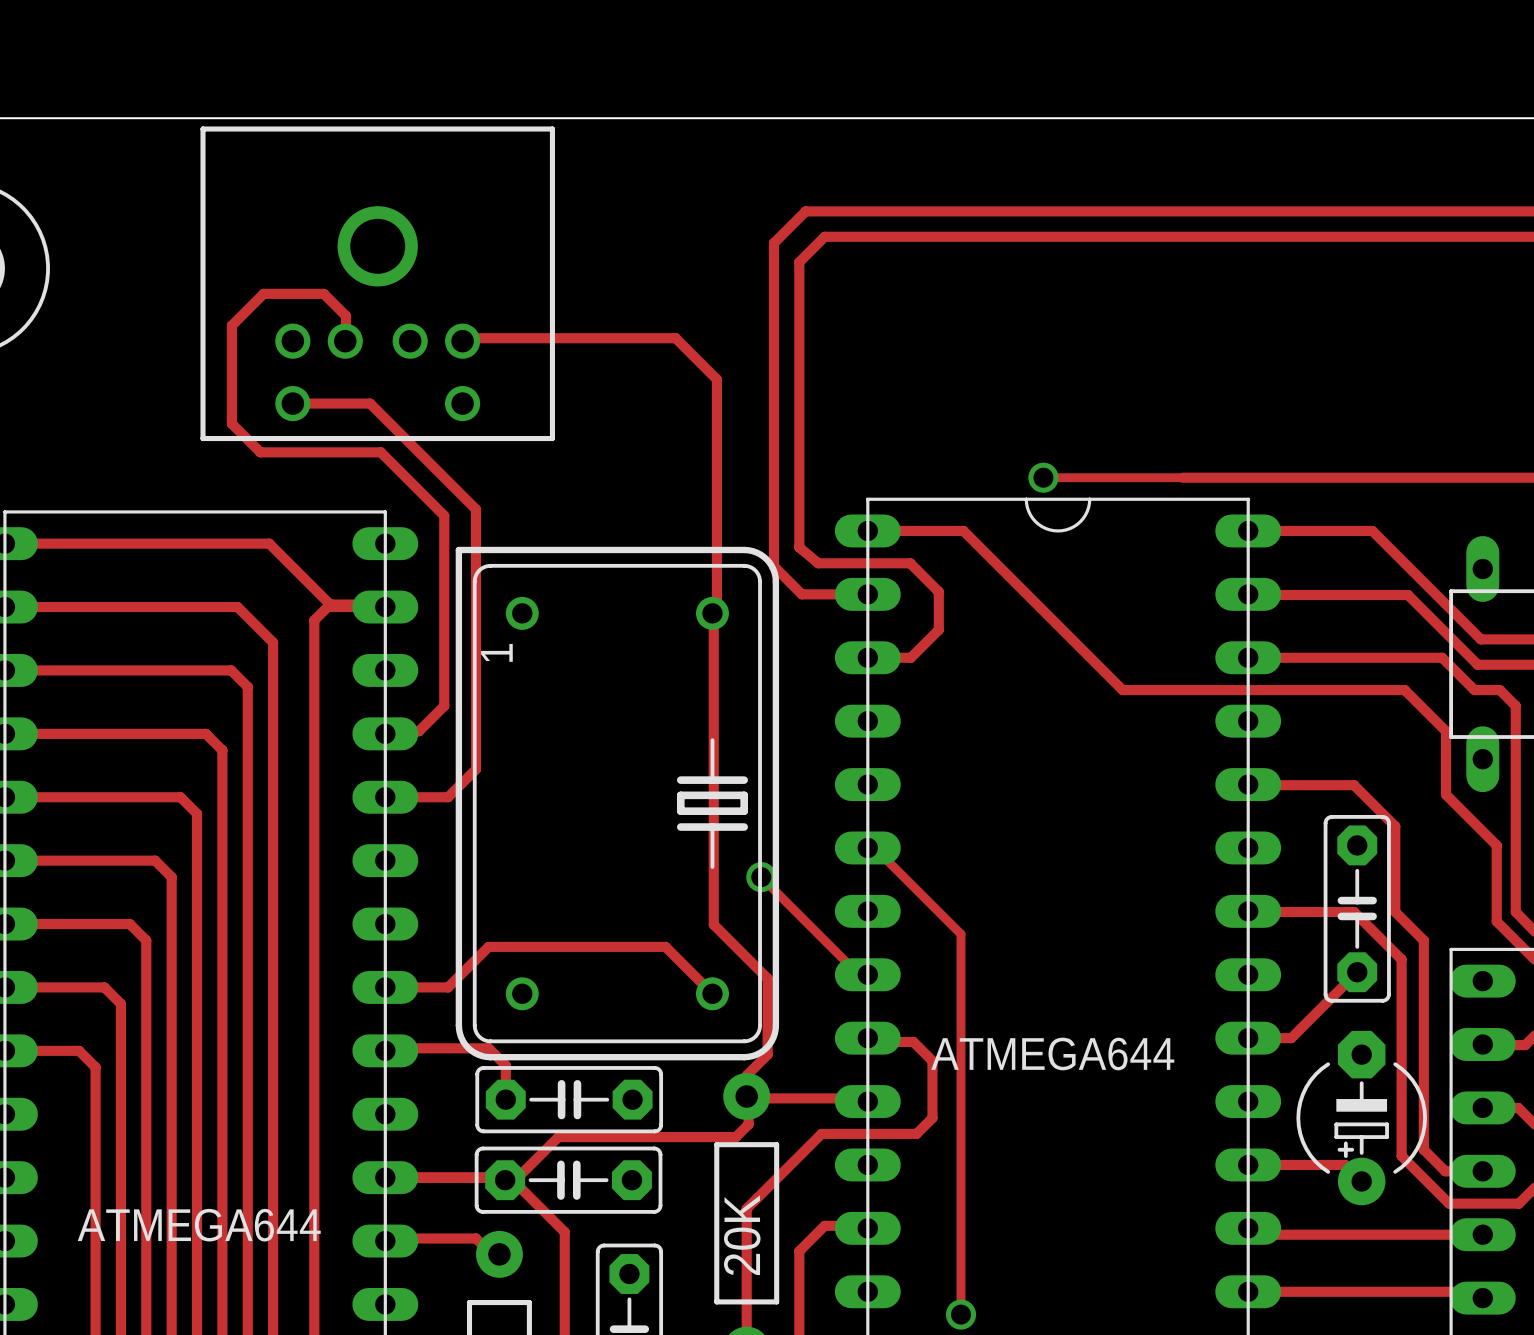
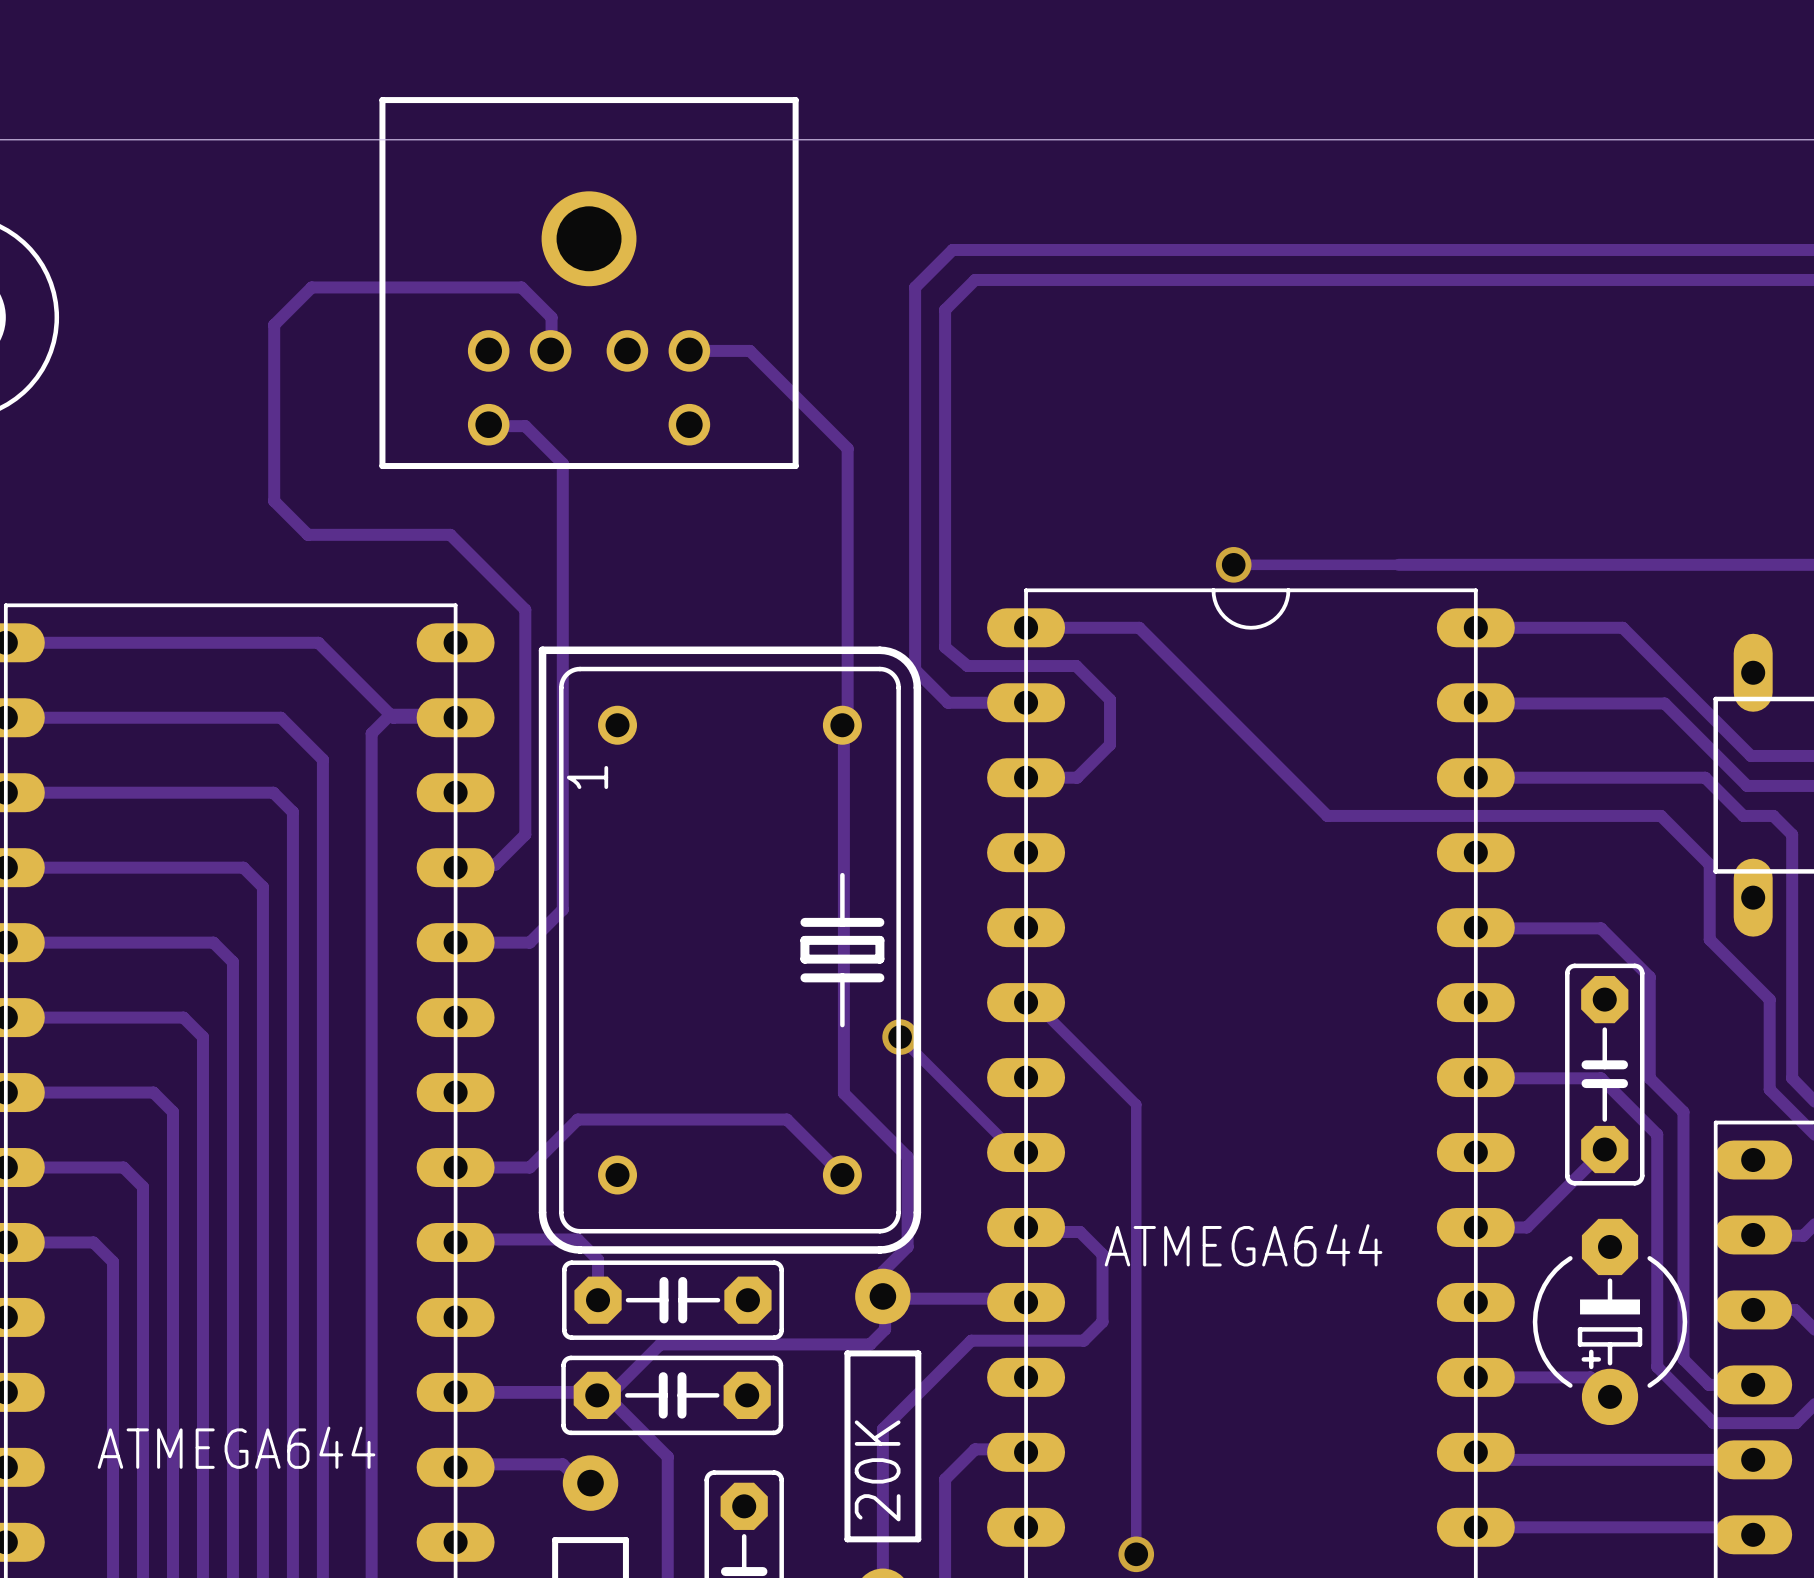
part position: (377, 283) -> (589, 283)
track: (231, 325) (263, 293) (323, 293) (346, 316) (345, 341) -> (274, 384) (274, 324) (311, 287) (521, 287) (551, 317) (550, 350)
track: (675, 338) (465, 338) (462, 341) -> (798, 399) (749, 350) (689, 350)
track: (292, 403) (370, 403) (475, 509) -> (488, 424) (525, 426) (562, 463) (562, 602)

